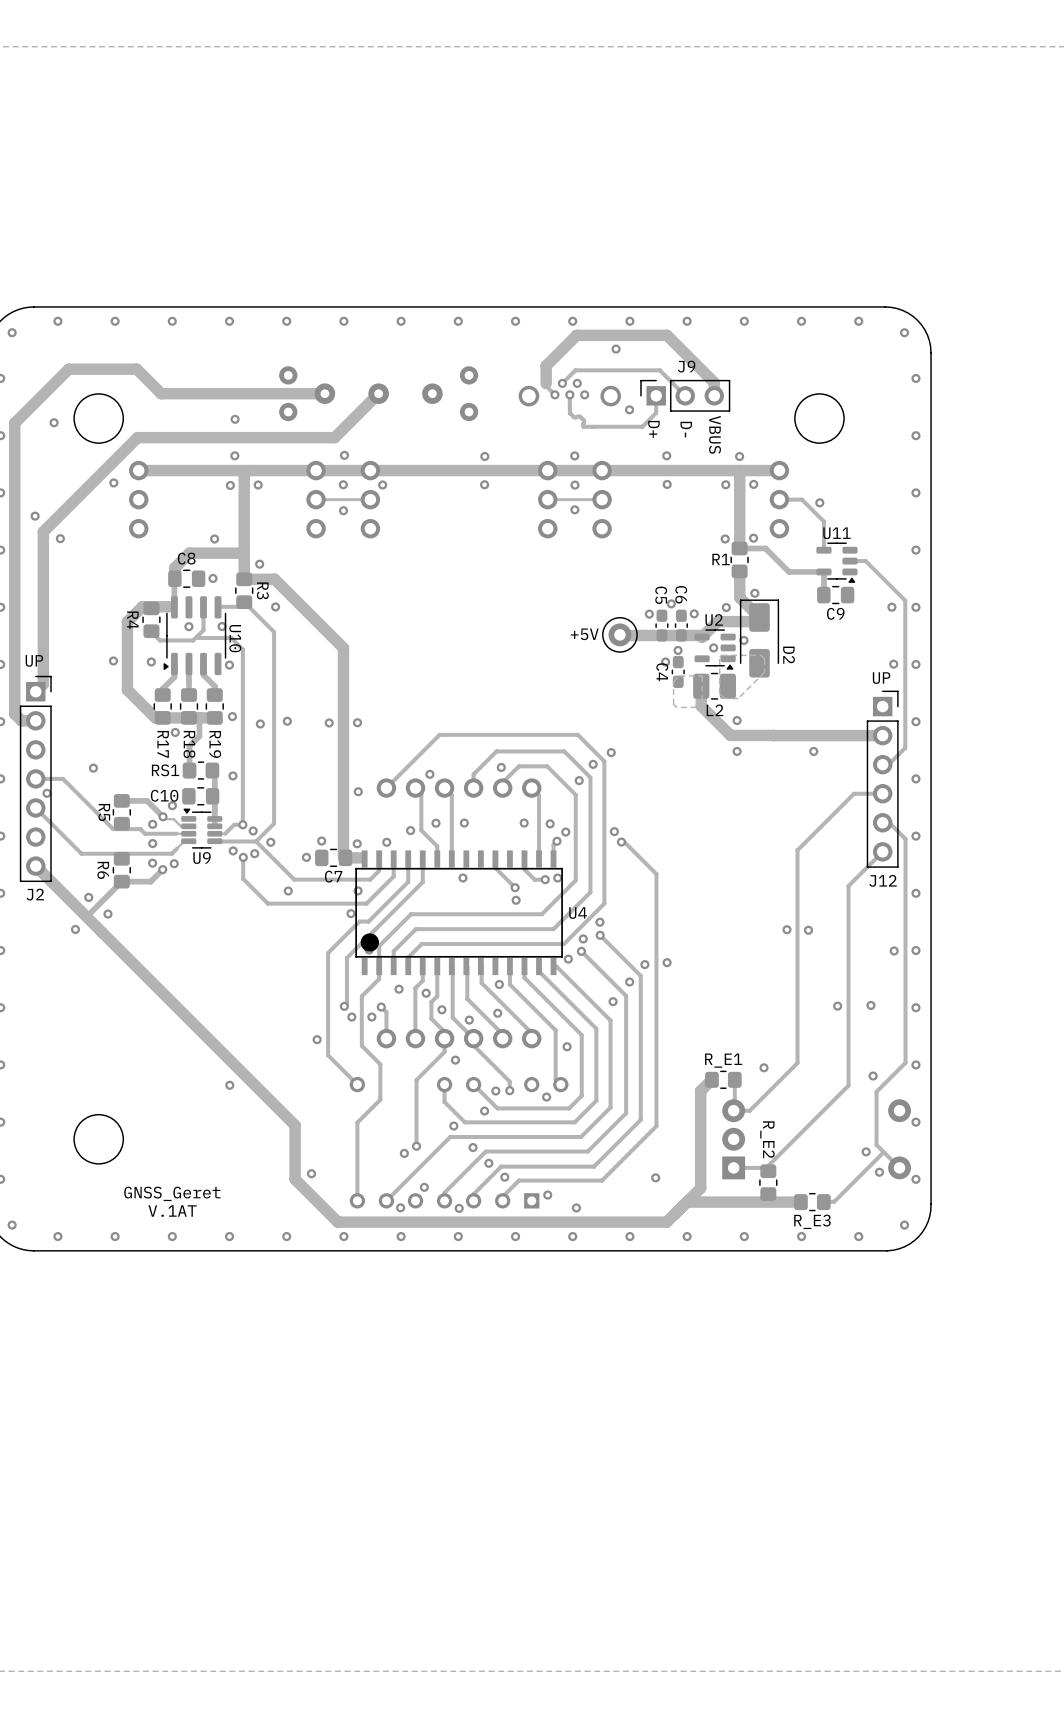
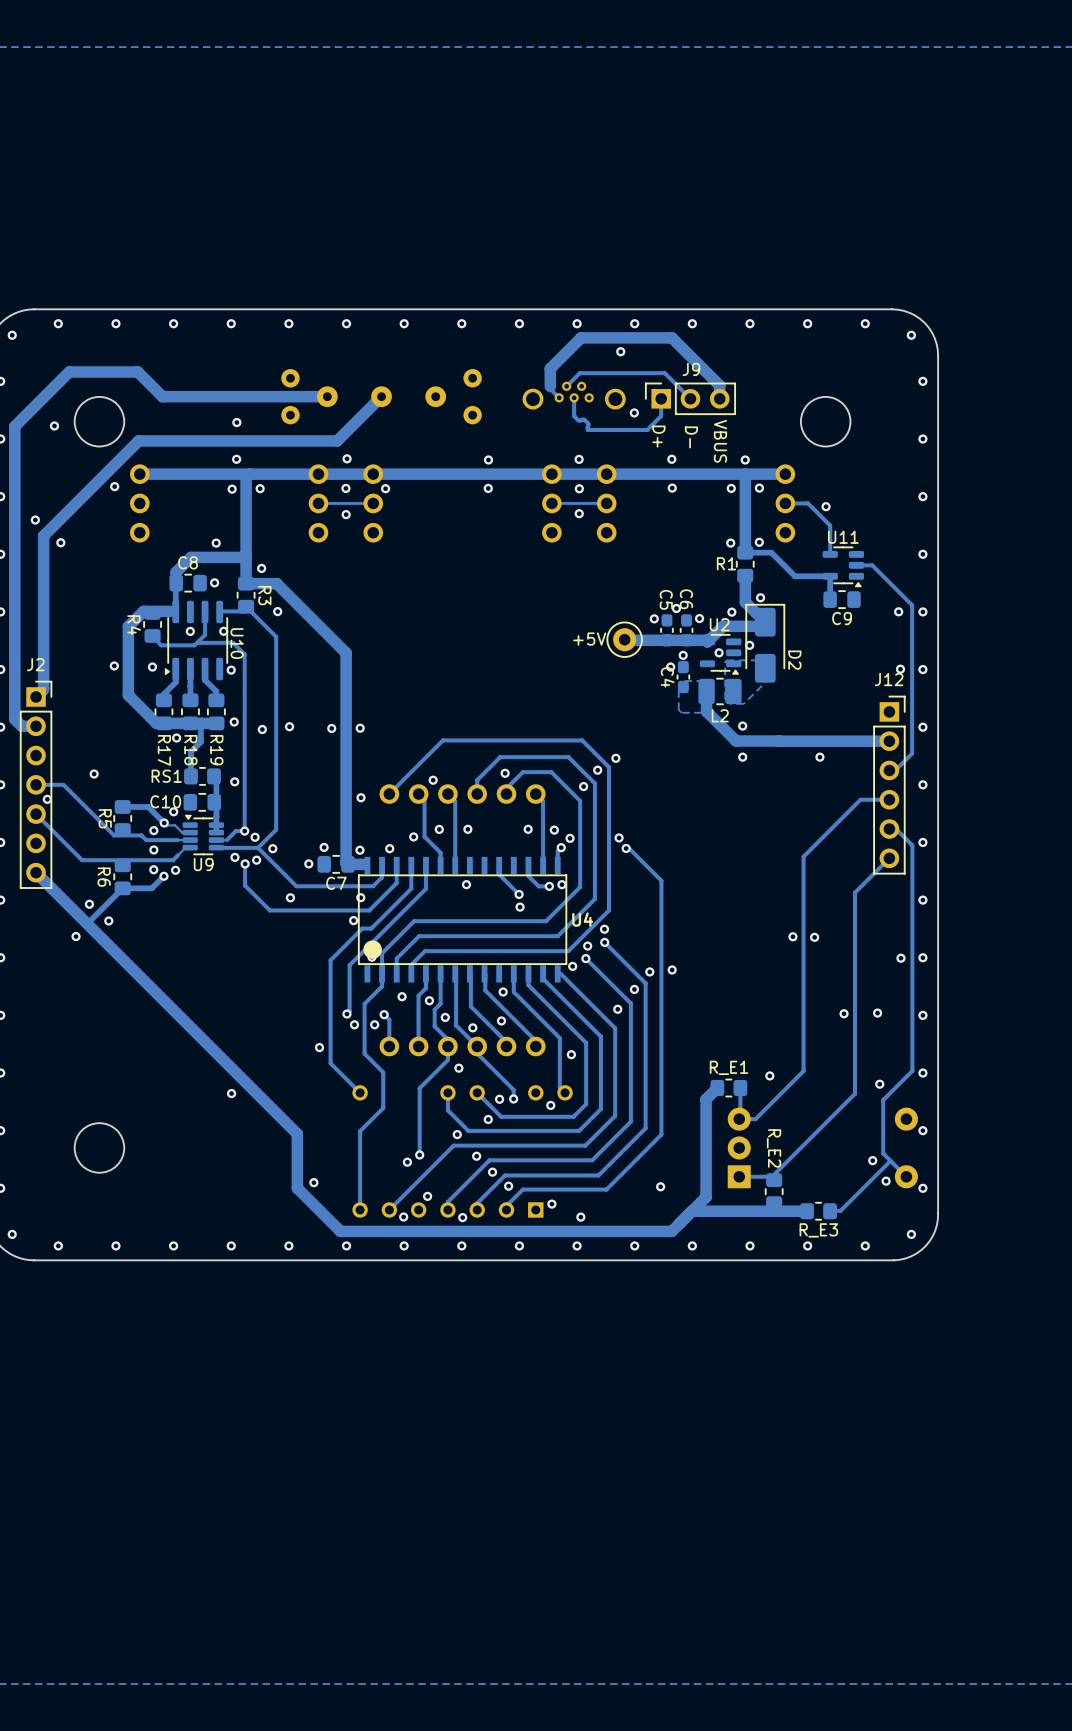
text: UP (34, 660) -> none
text: UP (881, 678) -> none
J12 name position: J12 (883, 880) -> J12 (889, 679)
J2 name position: J2 (35, 894) -> J2 (35, 664)
text: GNSS_Geret (172, 1193) -> none
text: V.1AT (172, 1211) -> none

